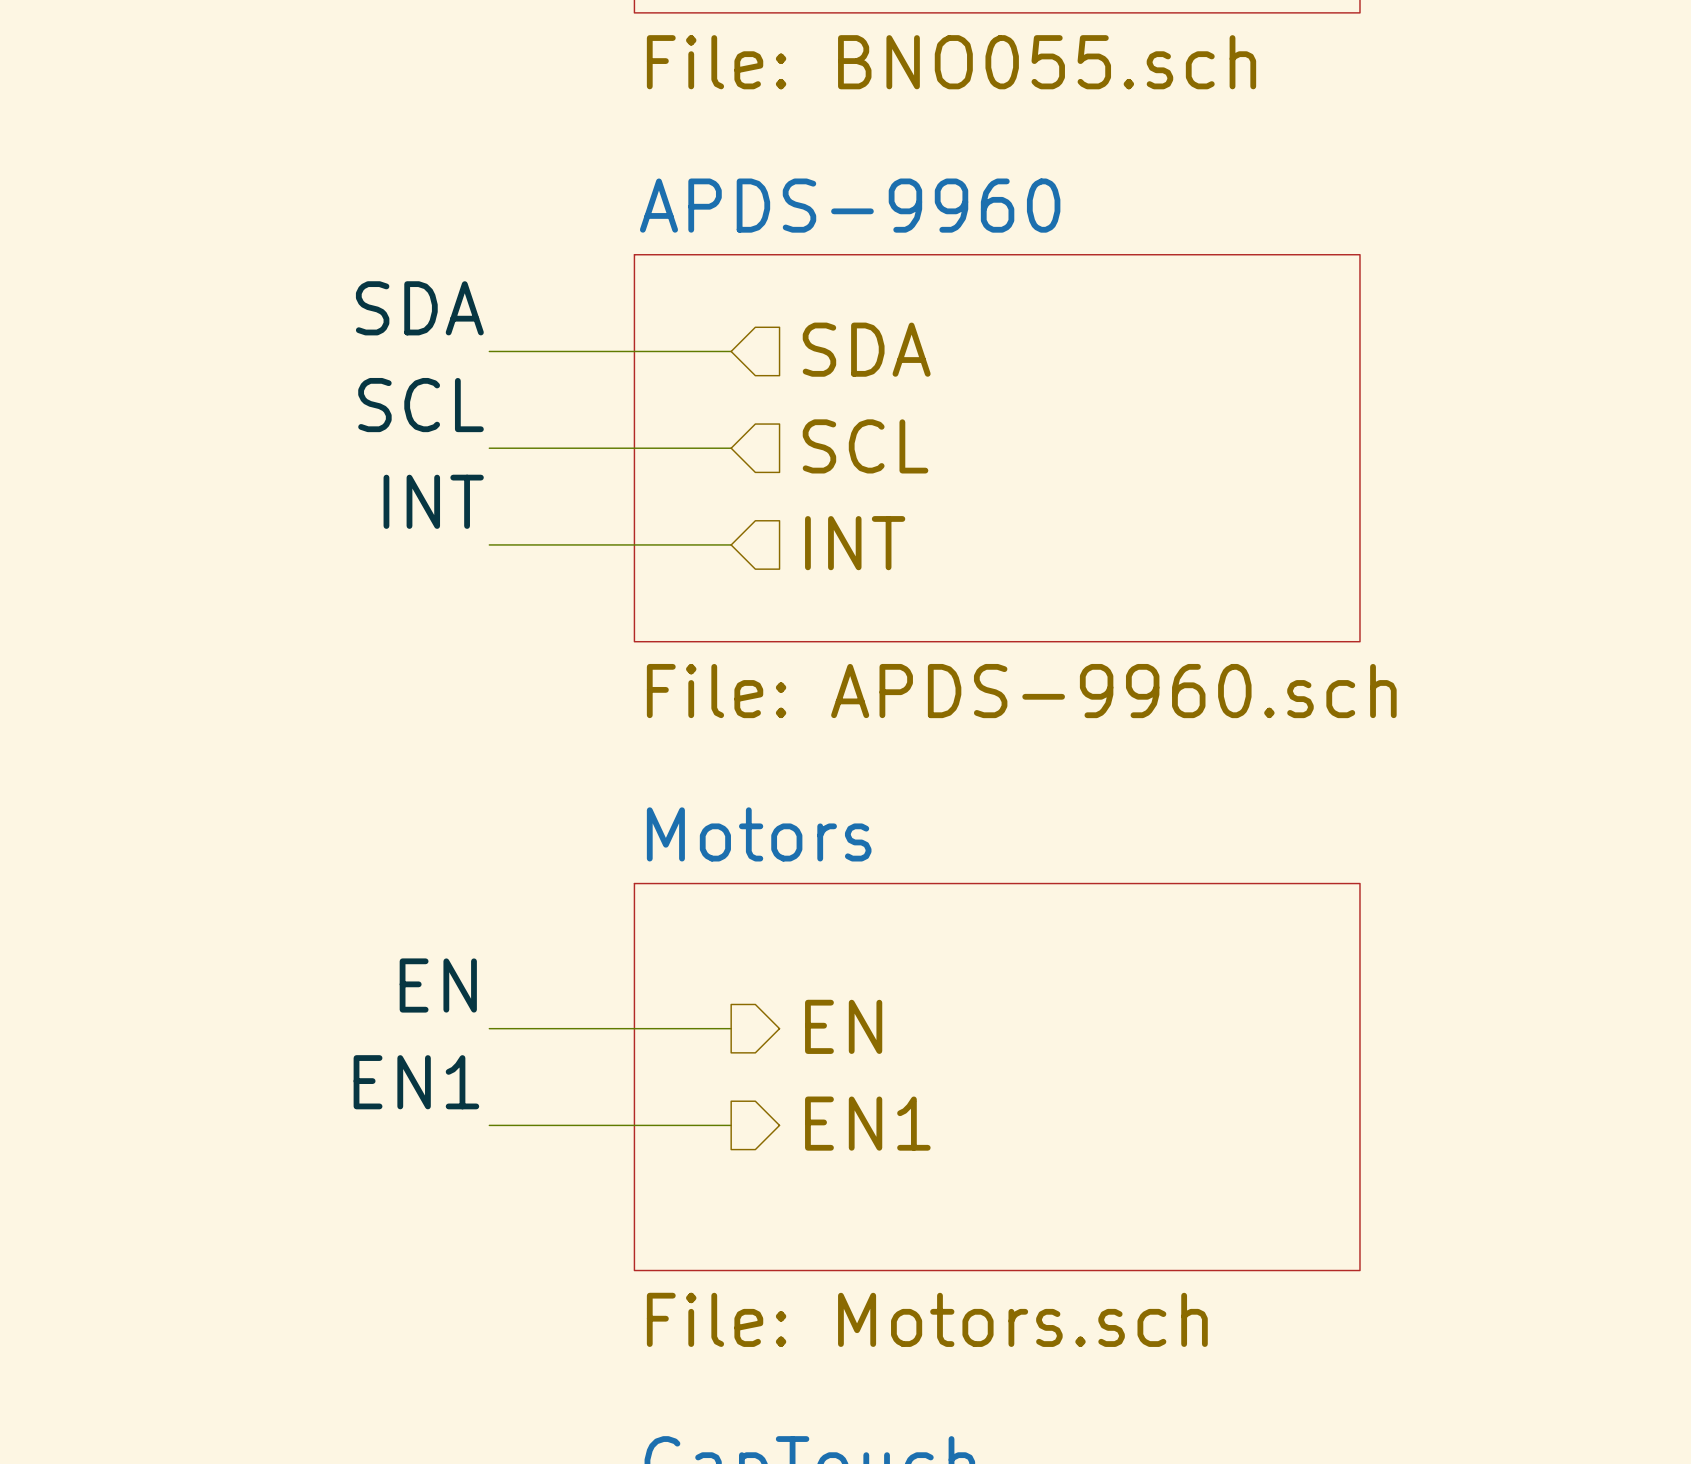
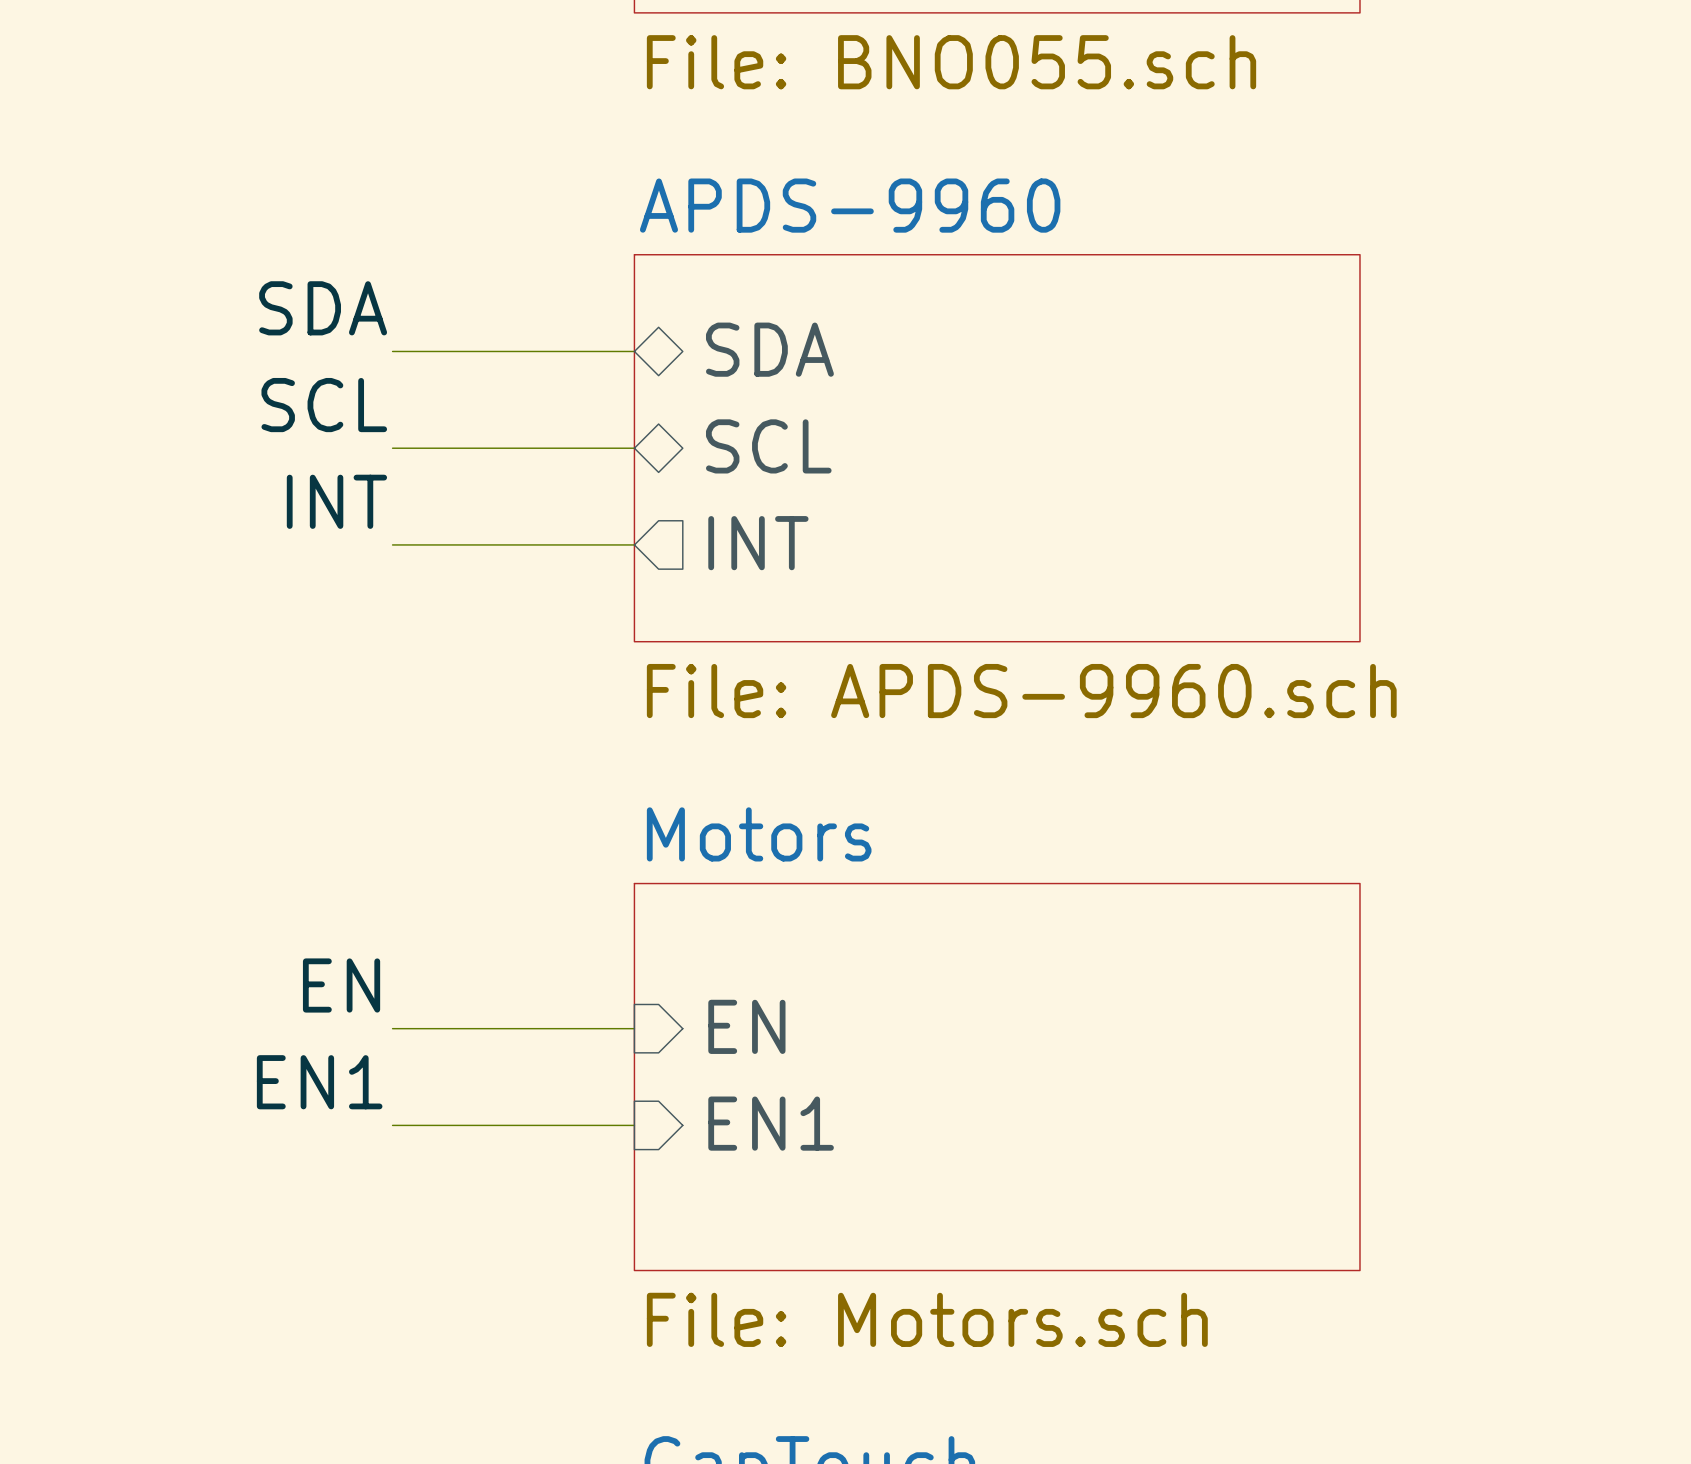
label position: SDA (419, 308) -> SDA (323, 308)
sheet pin: none -> SDA (769, 349)
hierarchical label: SDA (866, 349) -> none
wire: (634, 351) (731, 351) -> (392, 351) (489, 351)
label position: SCL (421, 405) -> SCL (324, 405)
sheet pin: none -> SCL (768, 446)
hierarchical label: SCL (865, 446) -> none
wire: (634, 448) (731, 448) -> (392, 448) (489, 448)
label position: INT (433, 501) -> INT (336, 501)
sheet pin: none -> INT (758, 543)
hierarchical label: INT (855, 543) -> none
wire: (634, 544) (731, 544) -> (392, 544) (489, 544)
label position: EN (438, 985) -> EN (341, 985)
sheet pin: none -> EN (746, 1026)
hierarchical label: EN (843, 1026) -> none
wire: (634, 1028) (731, 1028) -> (392, 1028) (489, 1028)
label position: EN1 (416, 1082) -> EN1 (319, 1082)
sheet pin: none -> EN1 (771, 1123)
hierarchical label: EN1 (867, 1123) -> none
wire: (634, 1125) (731, 1125) -> (392, 1125) (489, 1125)

